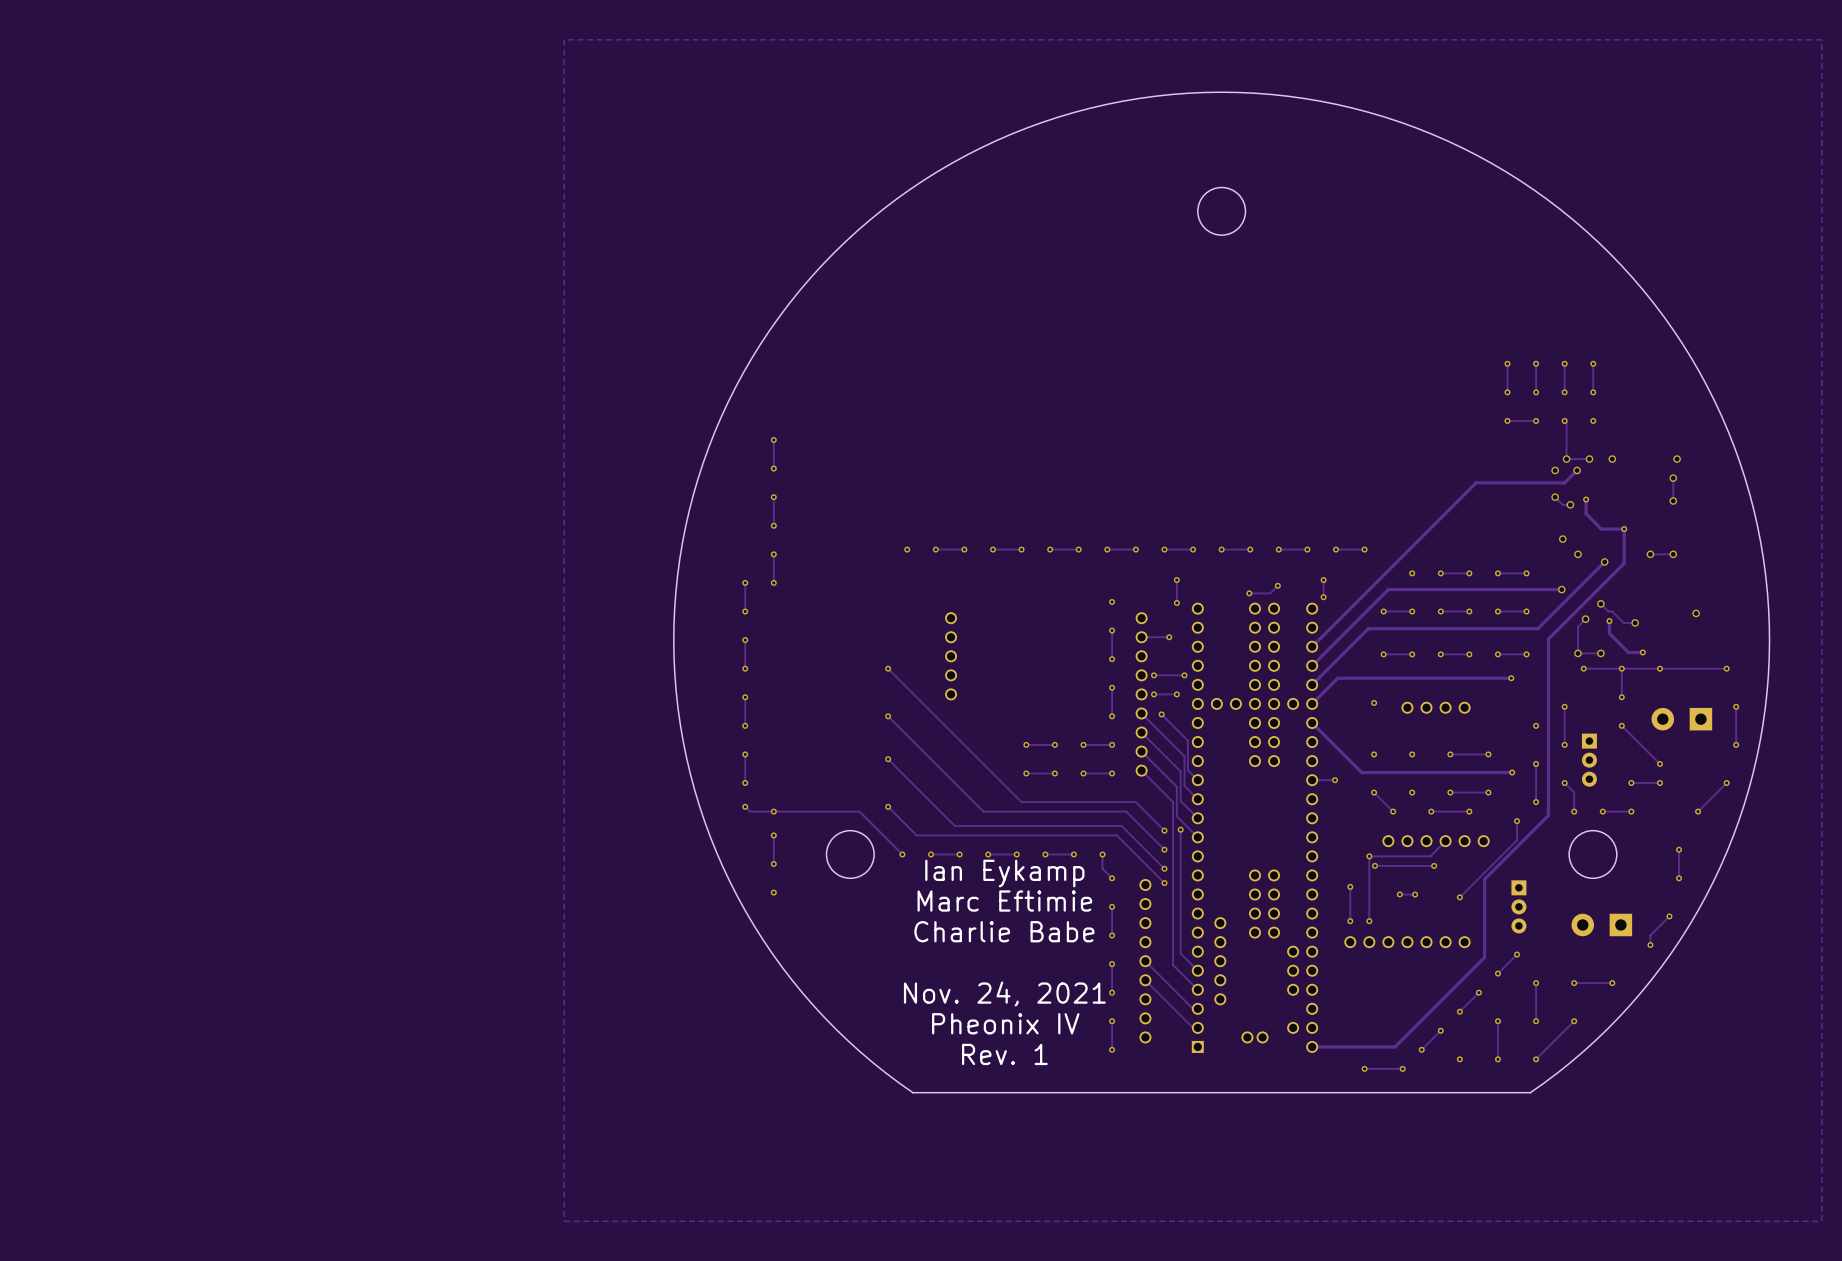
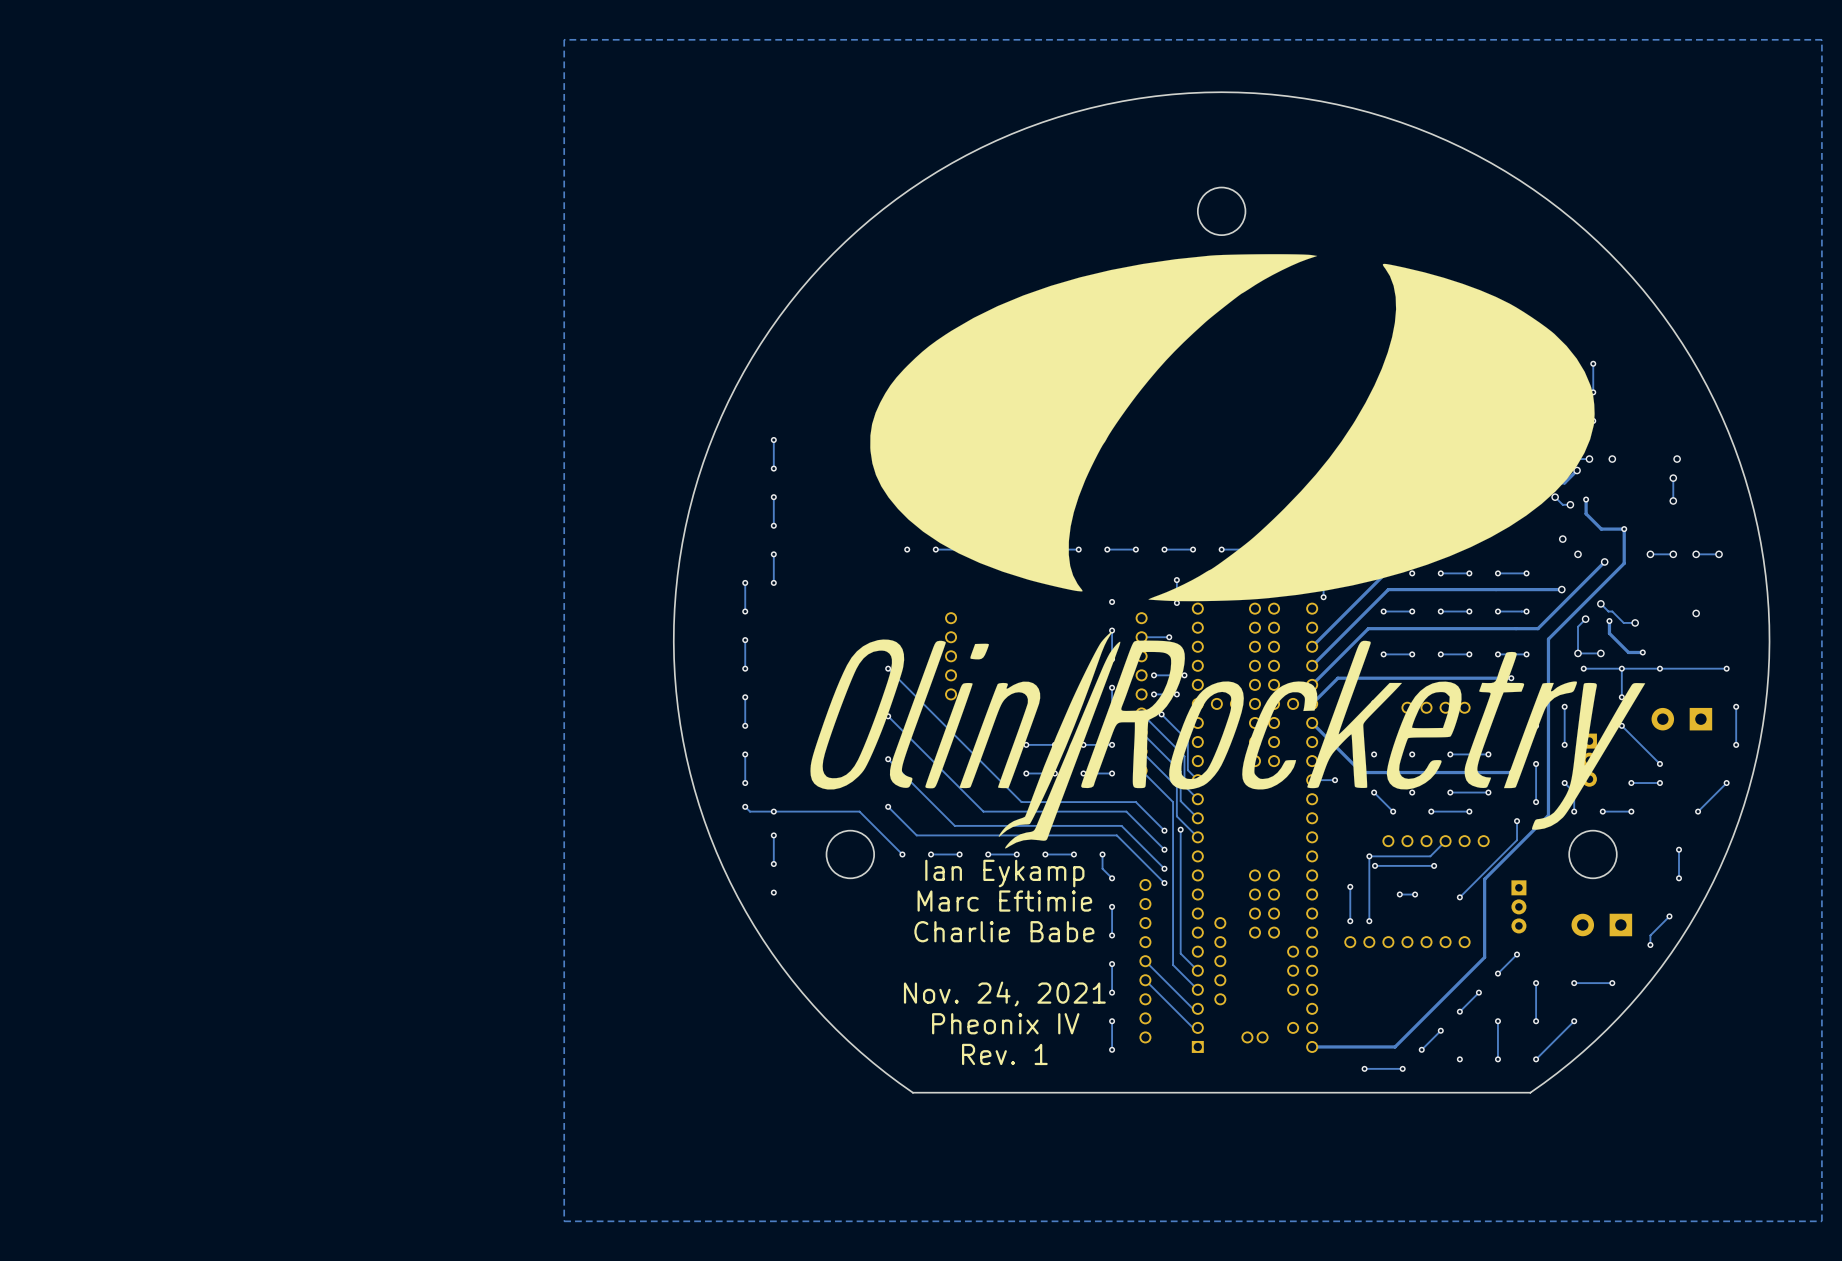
drawing: none -> [870, 254, 1595, 602]
via: none -> (1696, 554)
track: none -> (1719, 554) (1696, 554)
via: none -> (1719, 554)
drawing: none -> [810, 631, 1646, 849]

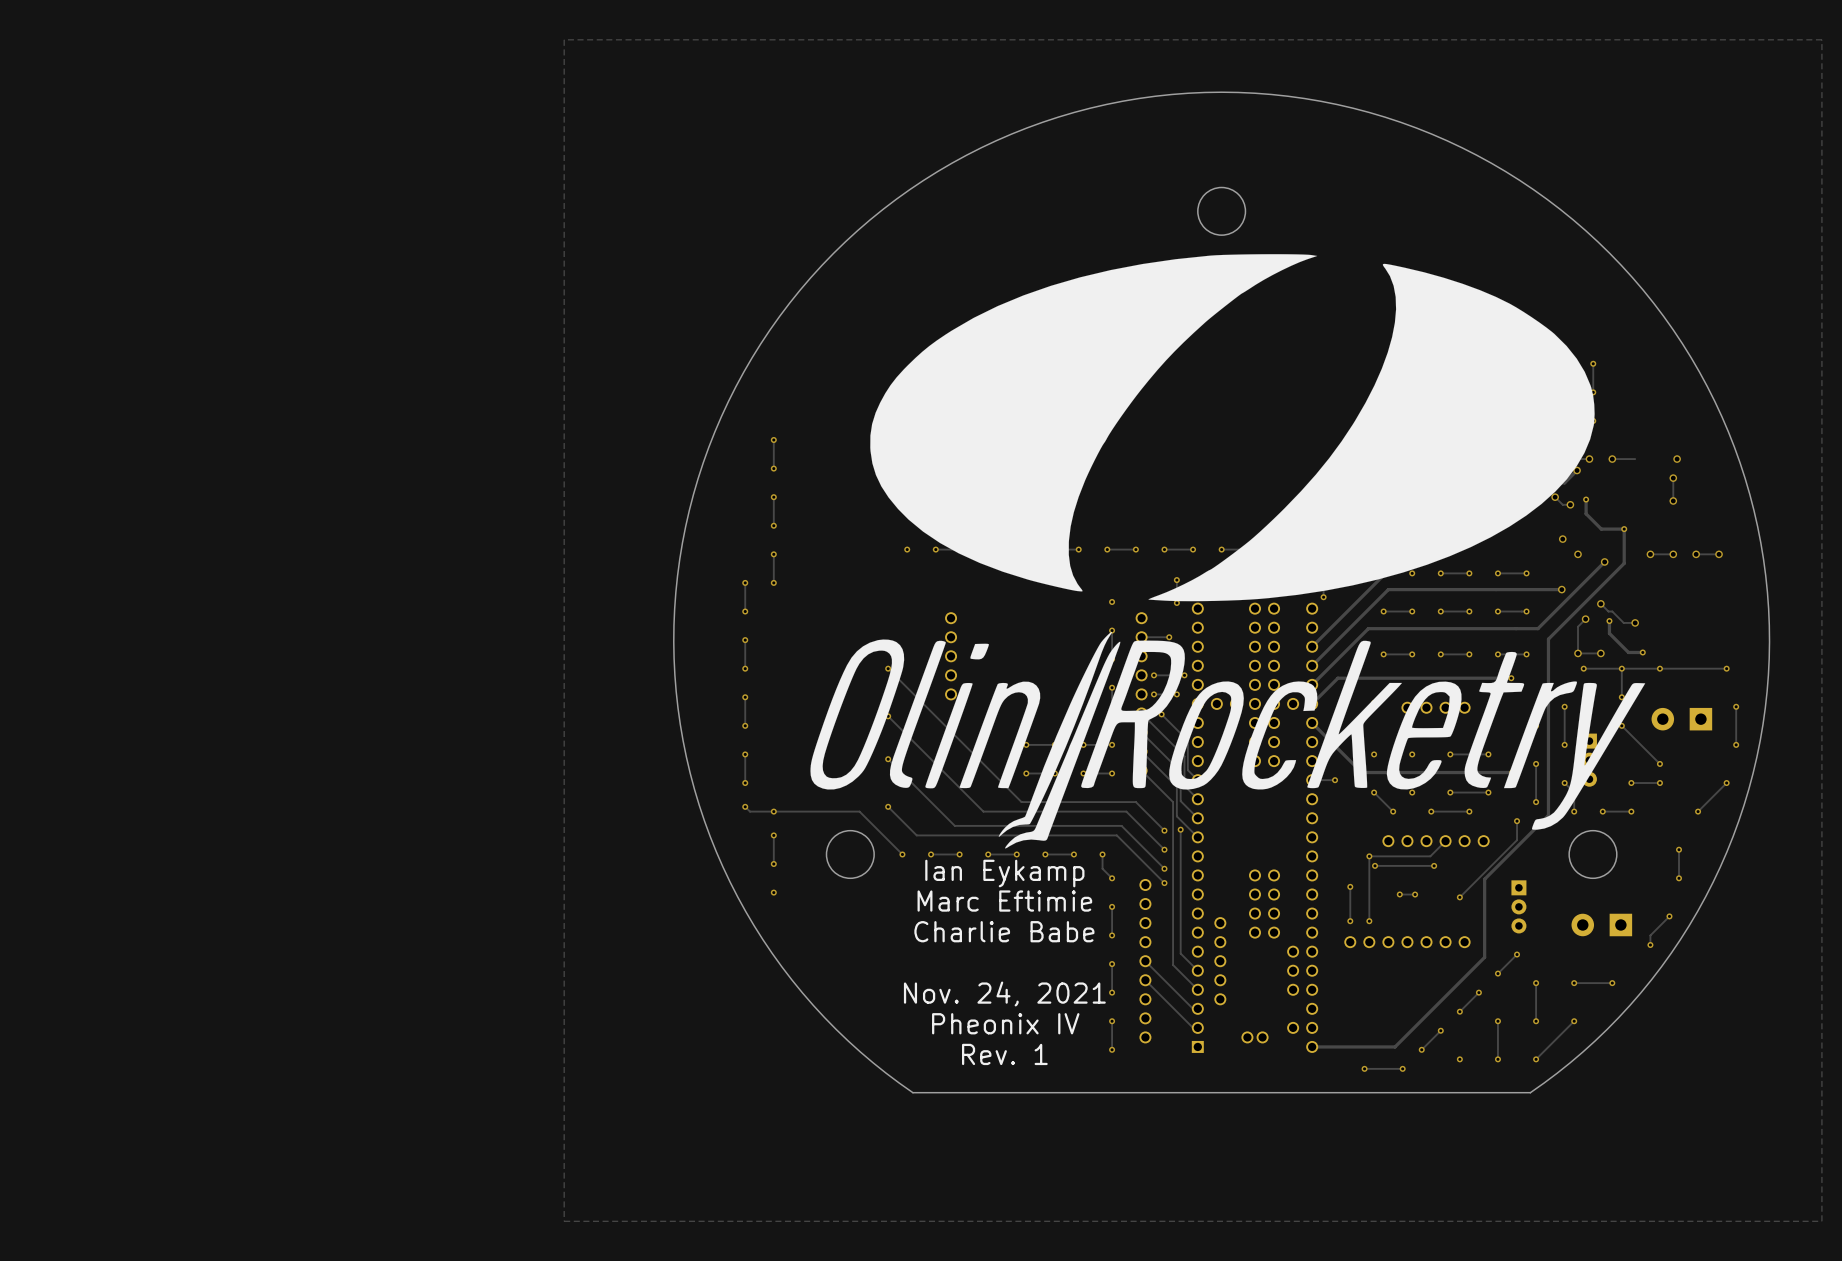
track: none -> (1635, 459) (1612, 459)
via: (1696, 613) -> none

